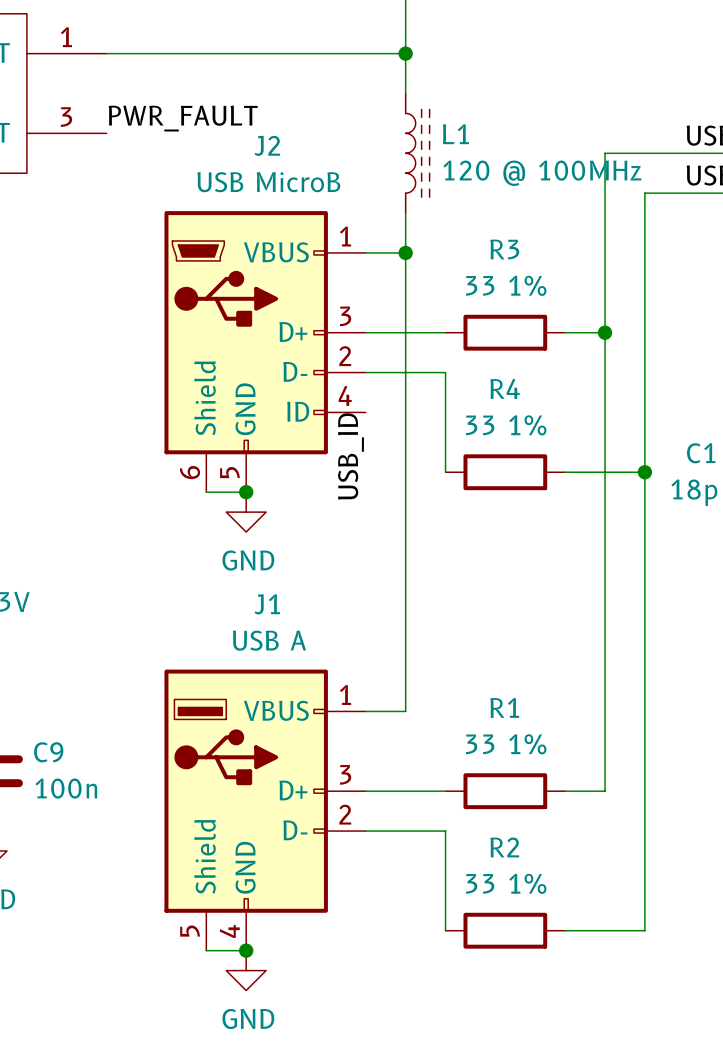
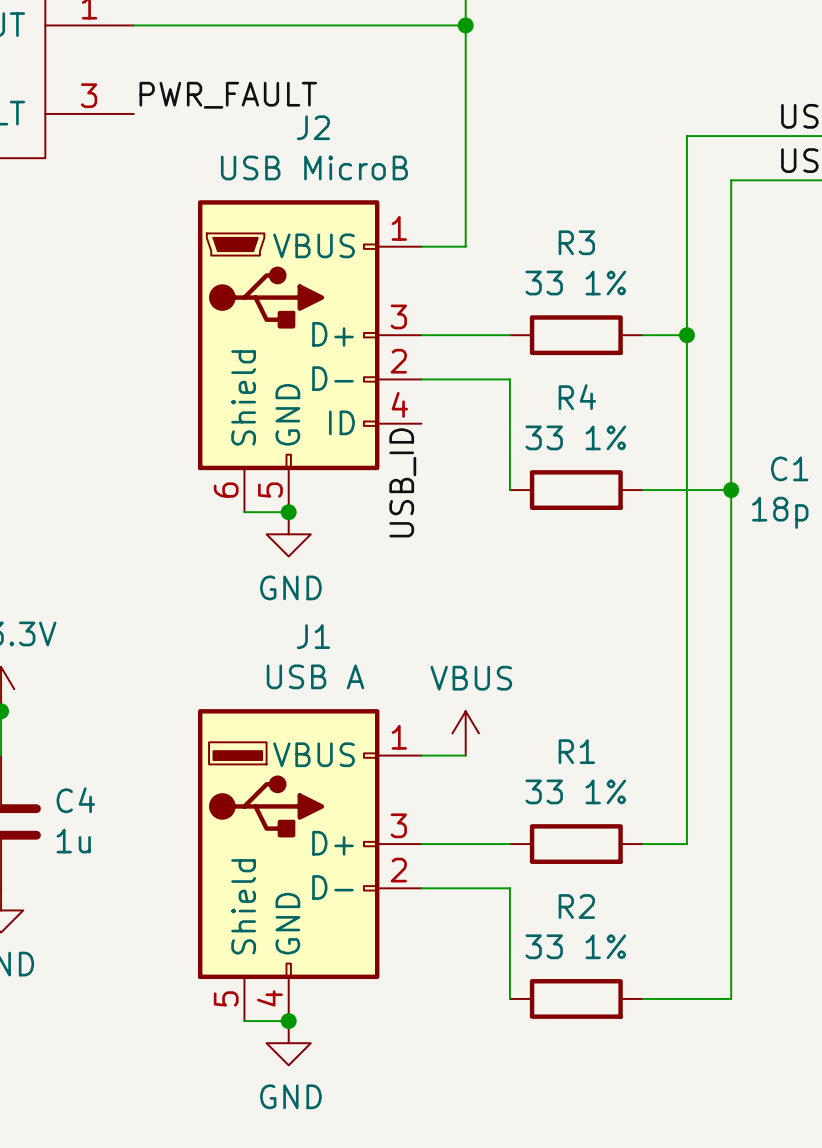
wire: none -> (465, 69) (465, 202)
L1: 120 @ 100MHz (417, 153) -> none
wire: (405, 252) (405, 711) -> none
junction: (405, 252) -> none
power symbol: none -> VBUS (465, 733)
C9 name: C9 (48, 752) -> C4 (75, 800)
C9 value: 100n (66, 788) -> 1u (73, 841)

